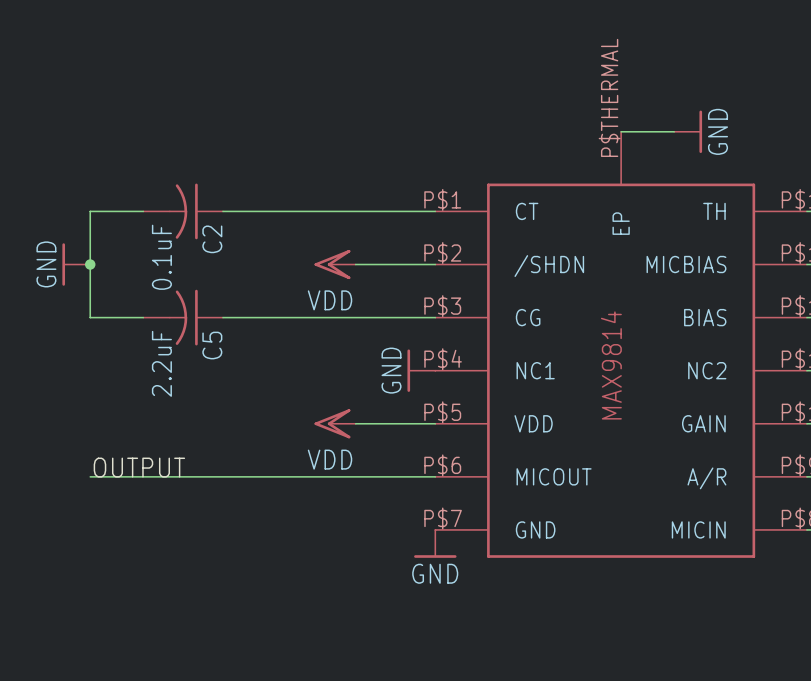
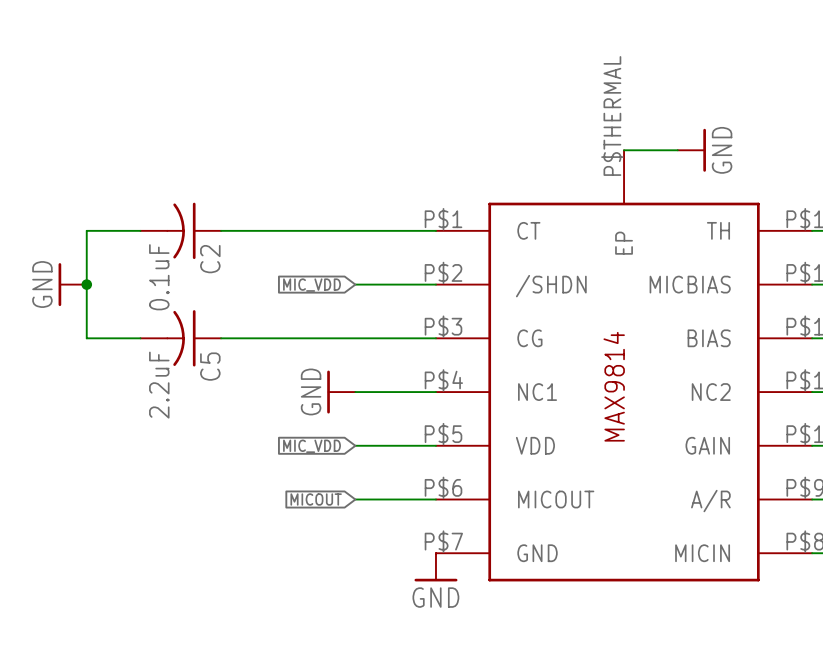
power symbol: VDD (335, 264) -> none
global label: none -> MIC_VDD (312, 285)
wire: none -> (355, 392) (435, 392)
power symbol position: GND (421, 370) -> GND (341, 392)
power symbol: VDD (335, 423) -> none
global label: none -> MIC_VDD (312, 446)
label: OUTPUT (139, 467) -> none
wire: (90, 476) (355, 476) -> none
global label: none -> MICOUT (316, 499)

